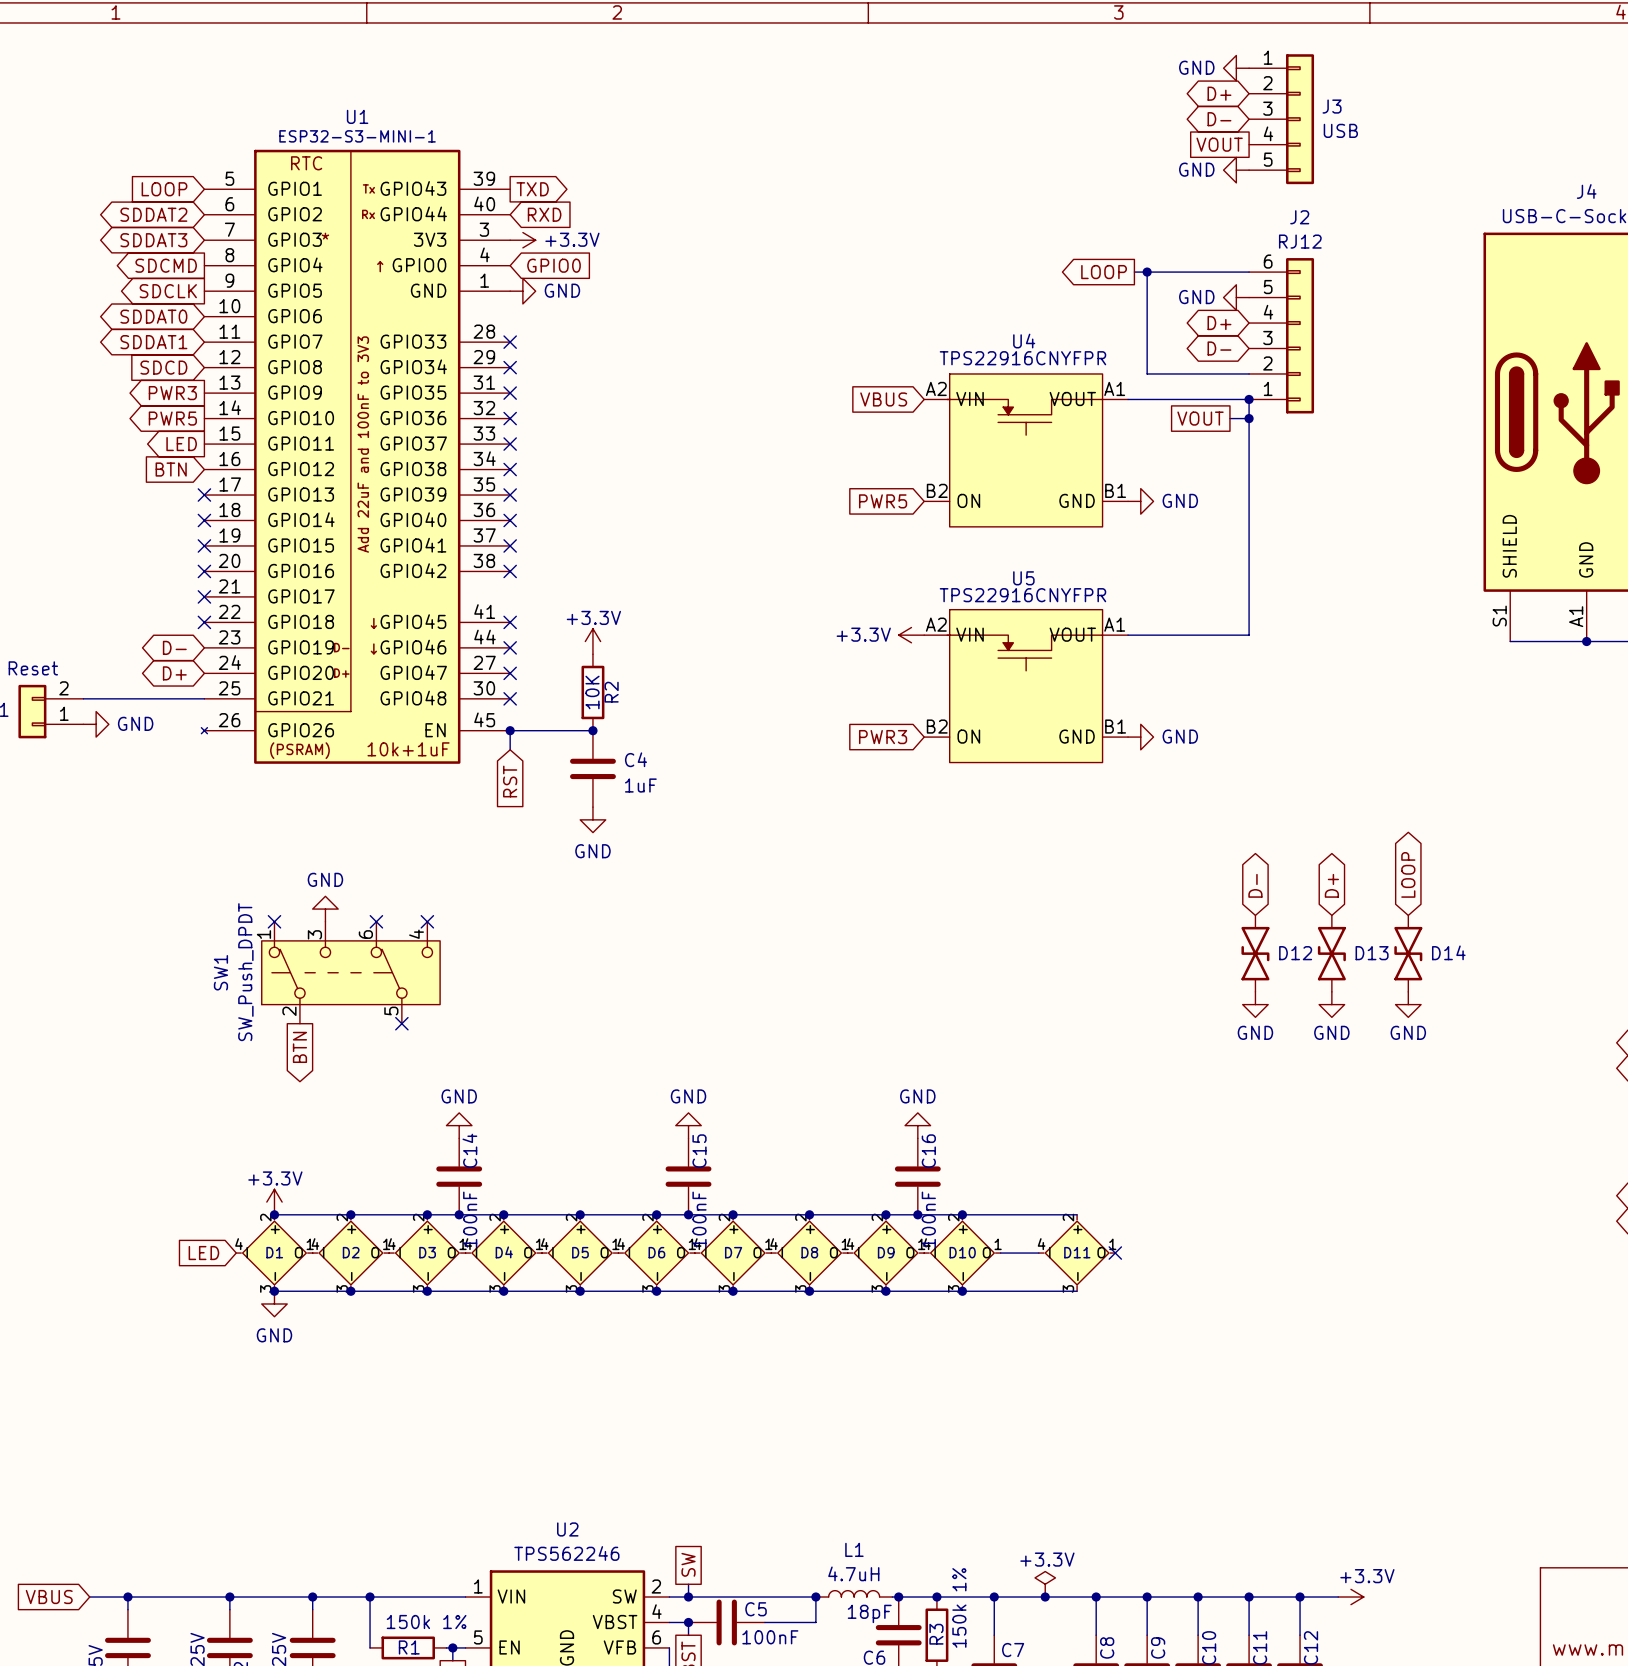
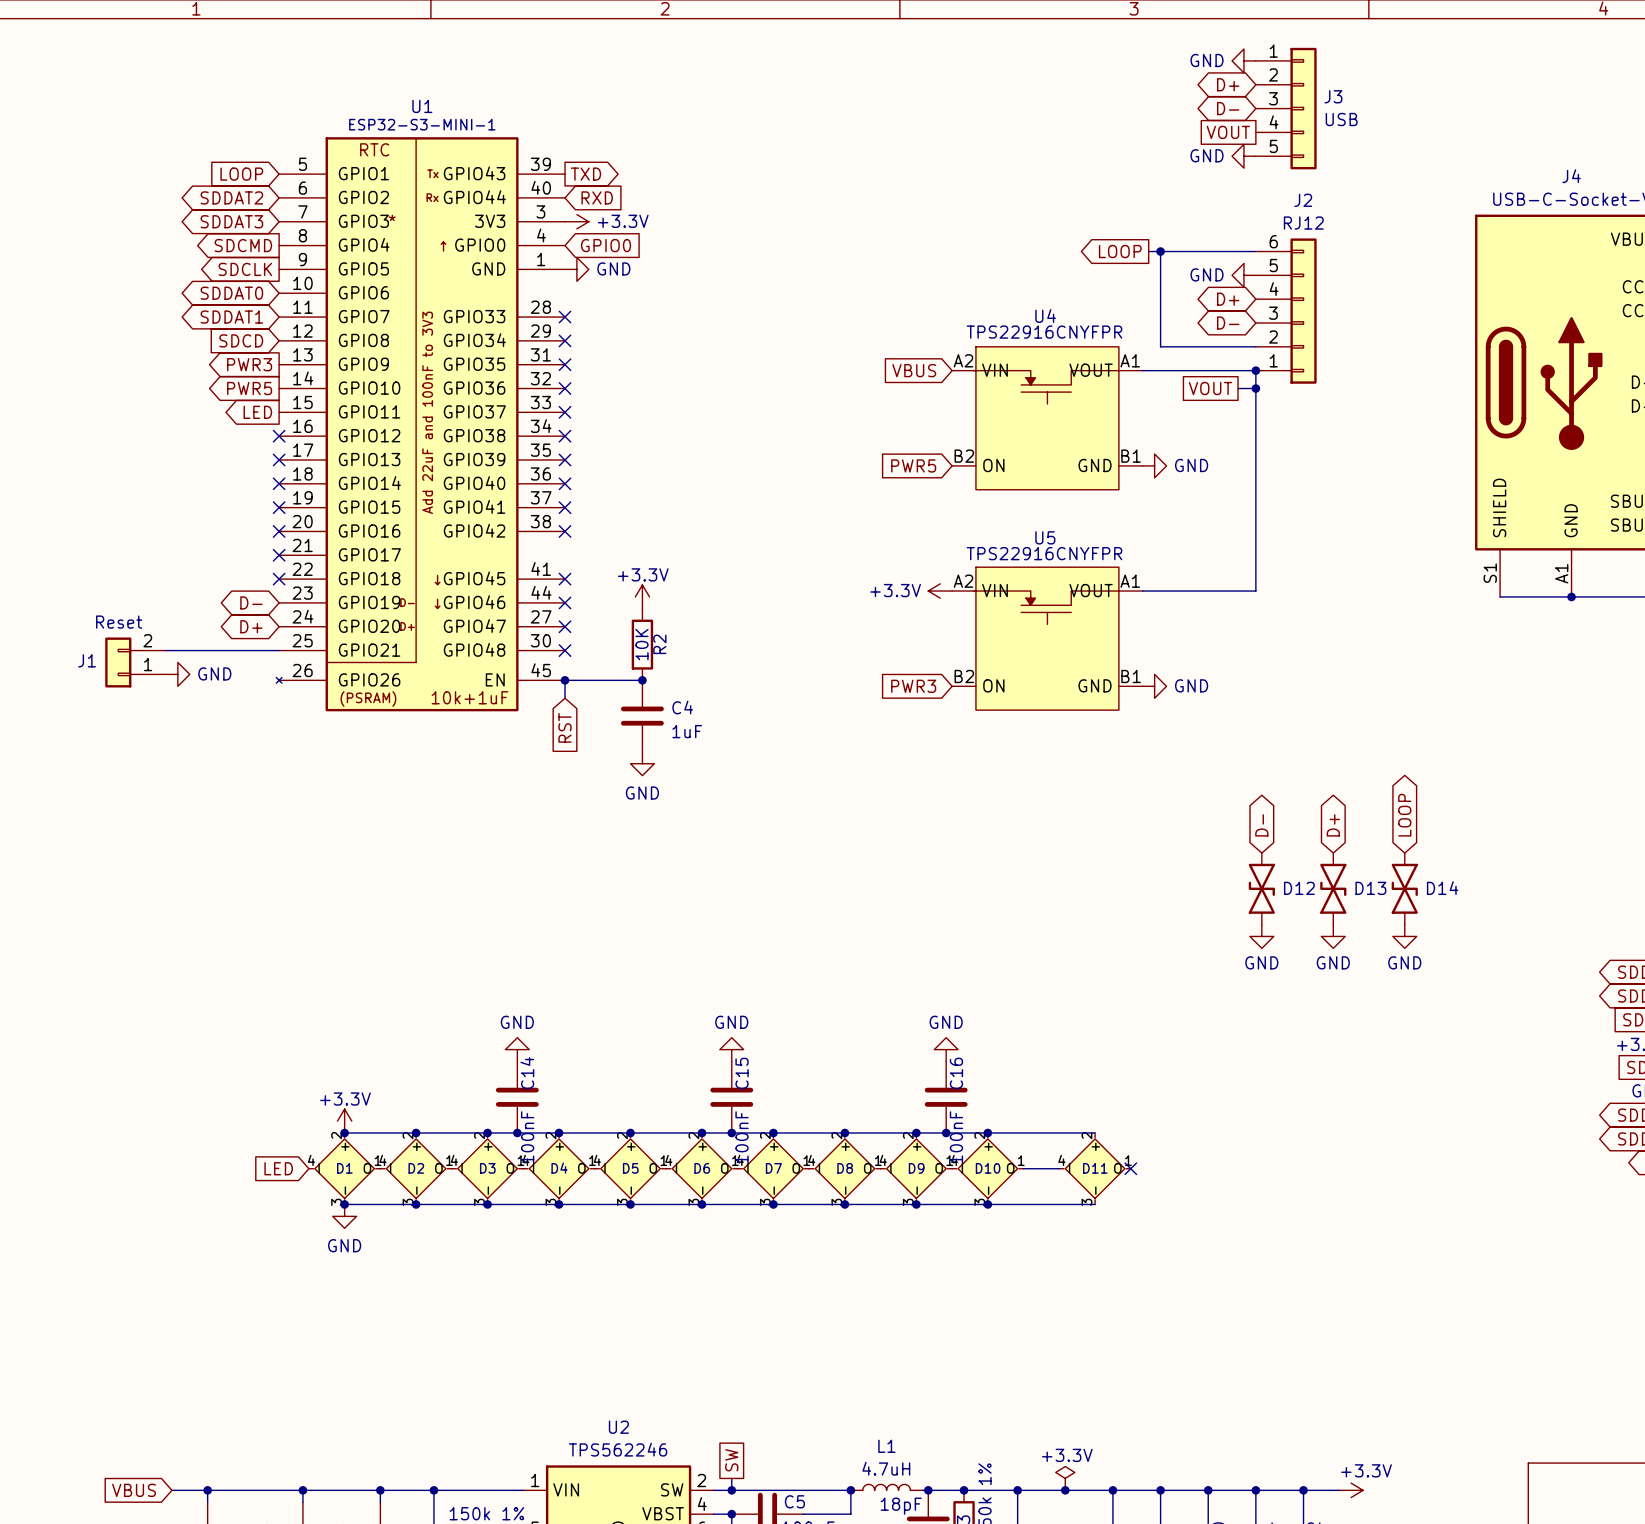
global label: BTN (171, 469) -> none
no-connect mark: none -> (279, 436)
power symbol: GND (325, 909) -> none
no-connect mark: (274, 921) -> none
no-connect mark: (376, 921) -> none
no-connect mark: (427, 921) -> none
SW1: SW_Push_DPDT (350, 972) -> none
no-connect mark: (401, 1023) -> none
global label: BTN (299, 1047) -> none

